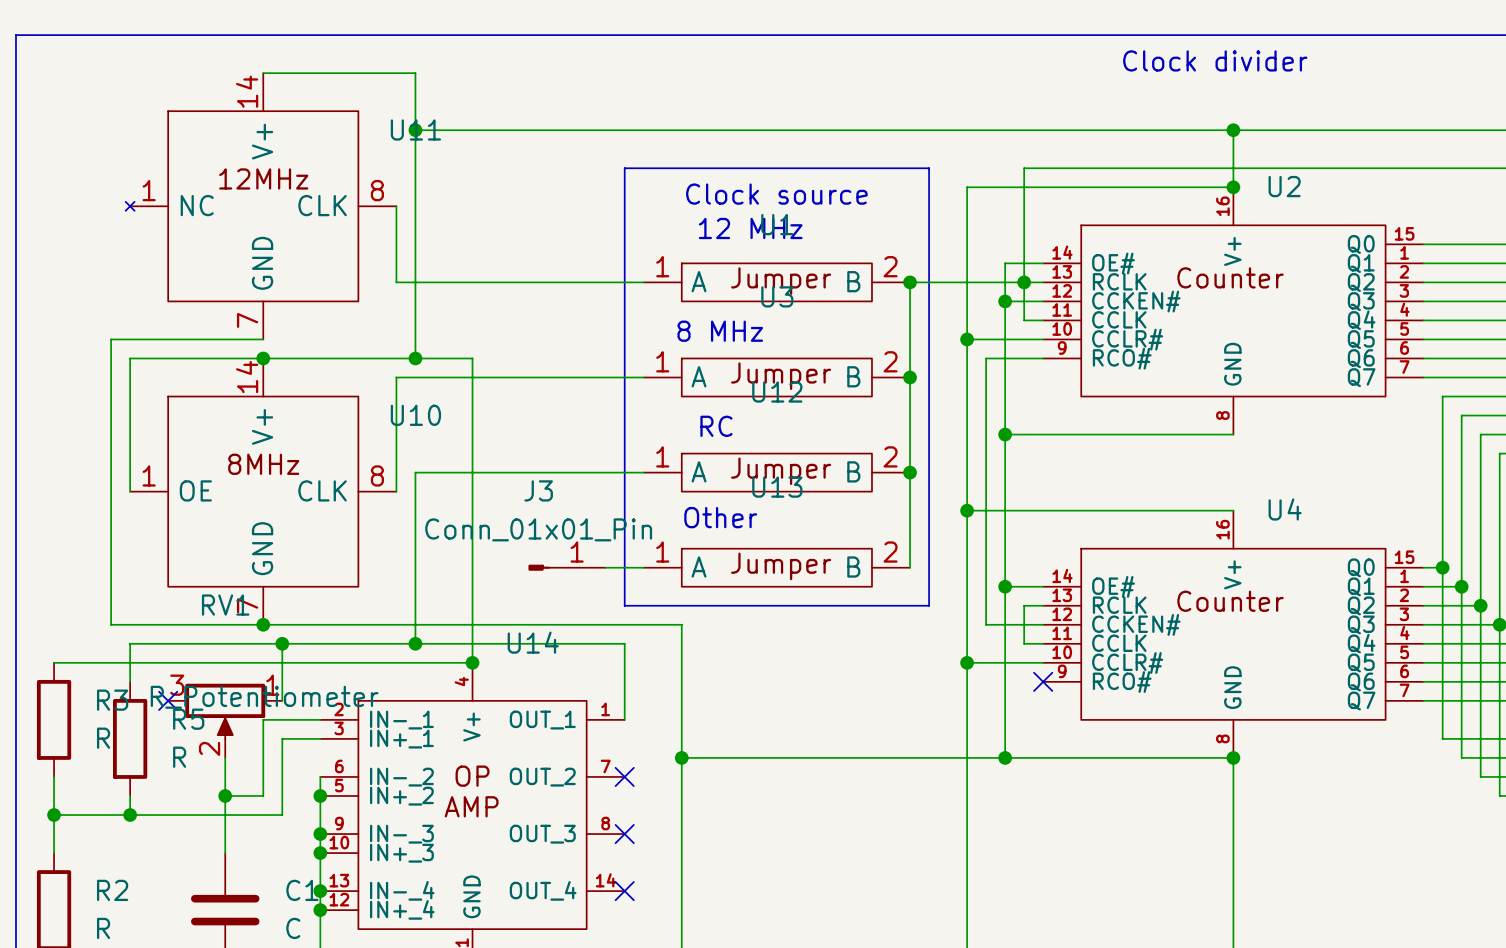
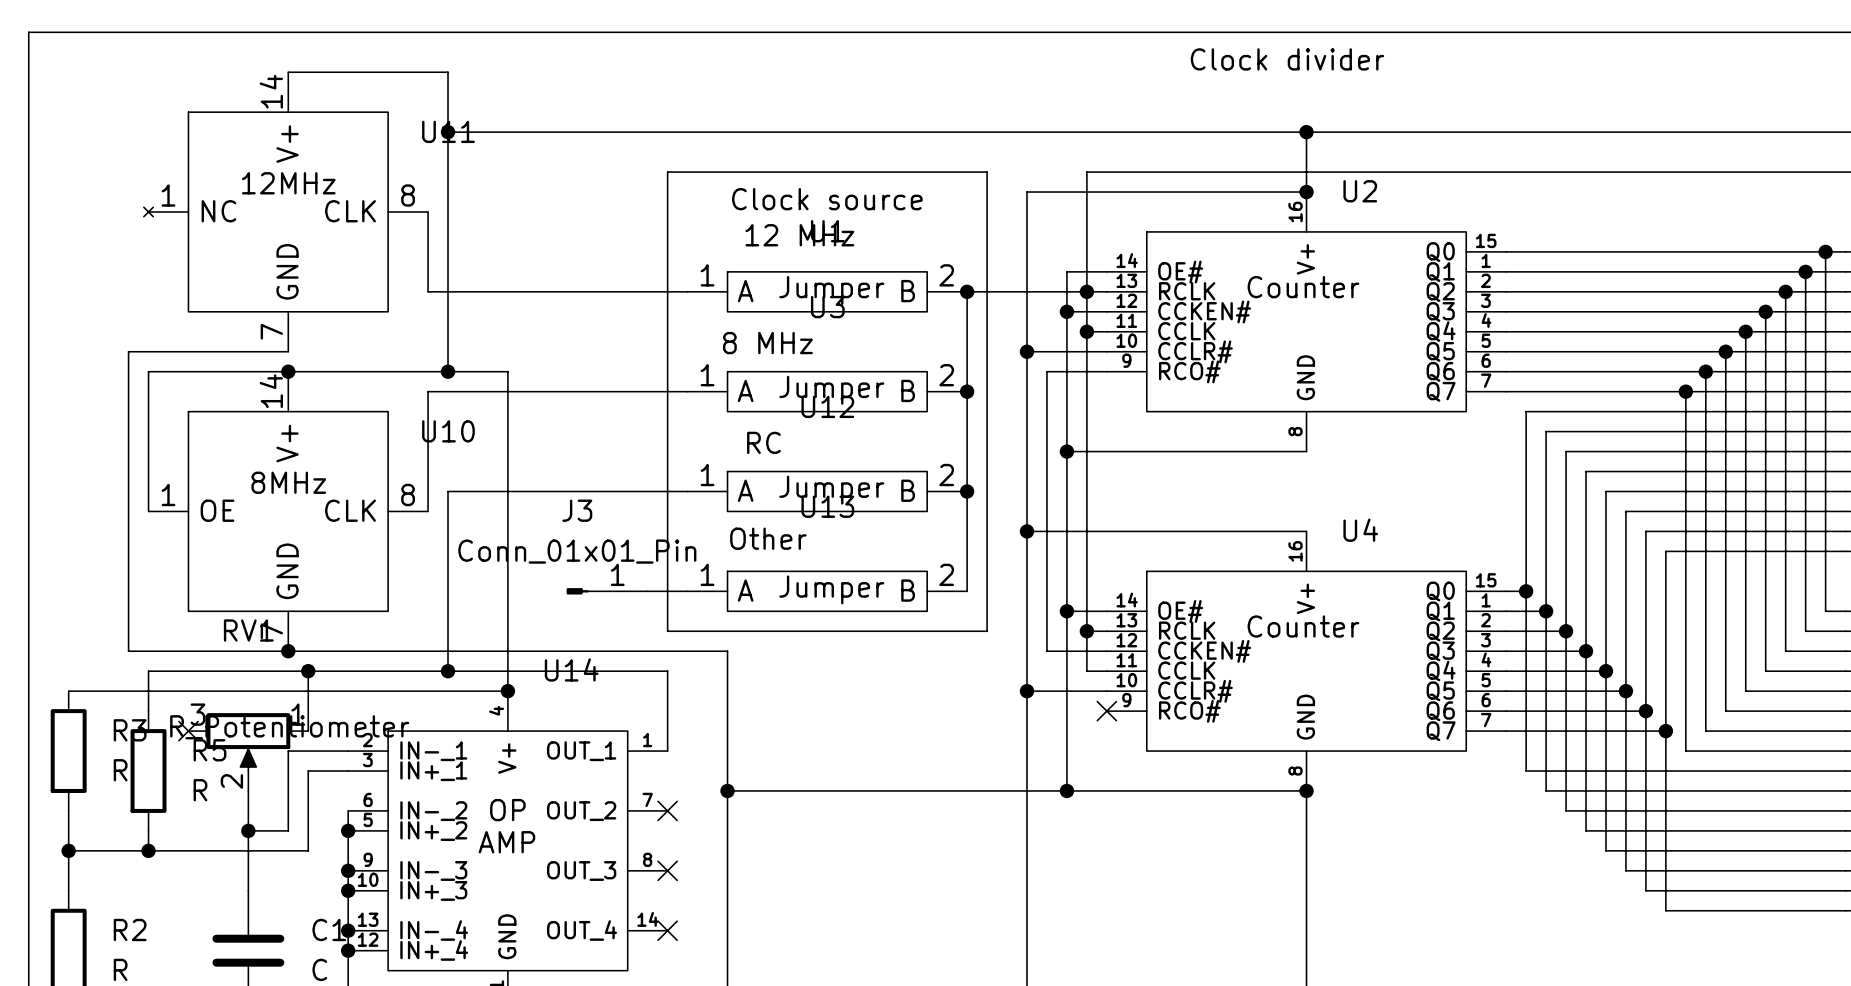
wire: none -> (1086, 331) (1086, 631)
junction: none -> (1086, 331)
junction: none -> (1086, 631)

